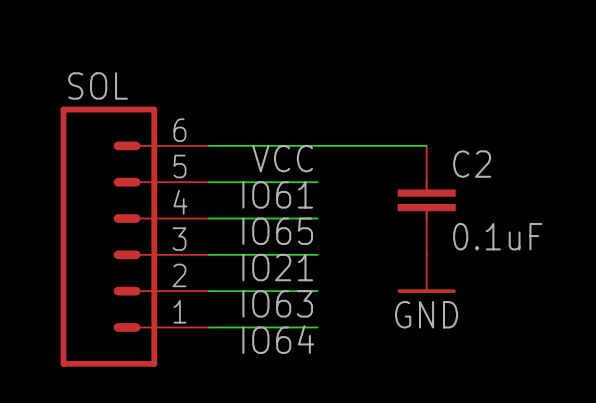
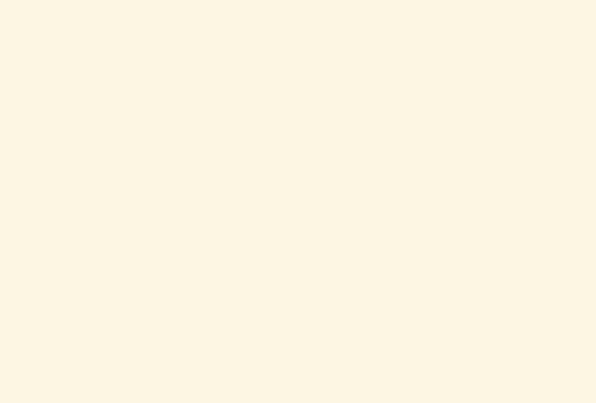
wire: (208, 145) (426, 145) -> none
label: VCC (282, 158) -> none
wire: (208, 182) (317, 182) -> none
label: IO61 (277, 194) -> none
C2: 0.1uF (426, 200) -> none
wire: (208, 218) (317, 218) -> none
label: IO65 (277, 231) -> none
SOL: (134, 236) -> none
wire: (208, 254) (317, 254) -> none
label: IO21 (277, 267) -> none
power symbol: GND (426, 273) -> none
wire: (208, 291) (317, 291) -> none
label: IO63 (277, 303) -> none
wire: (208, 327) (317, 327) -> none
label: IO64 (278, 339) -> none

